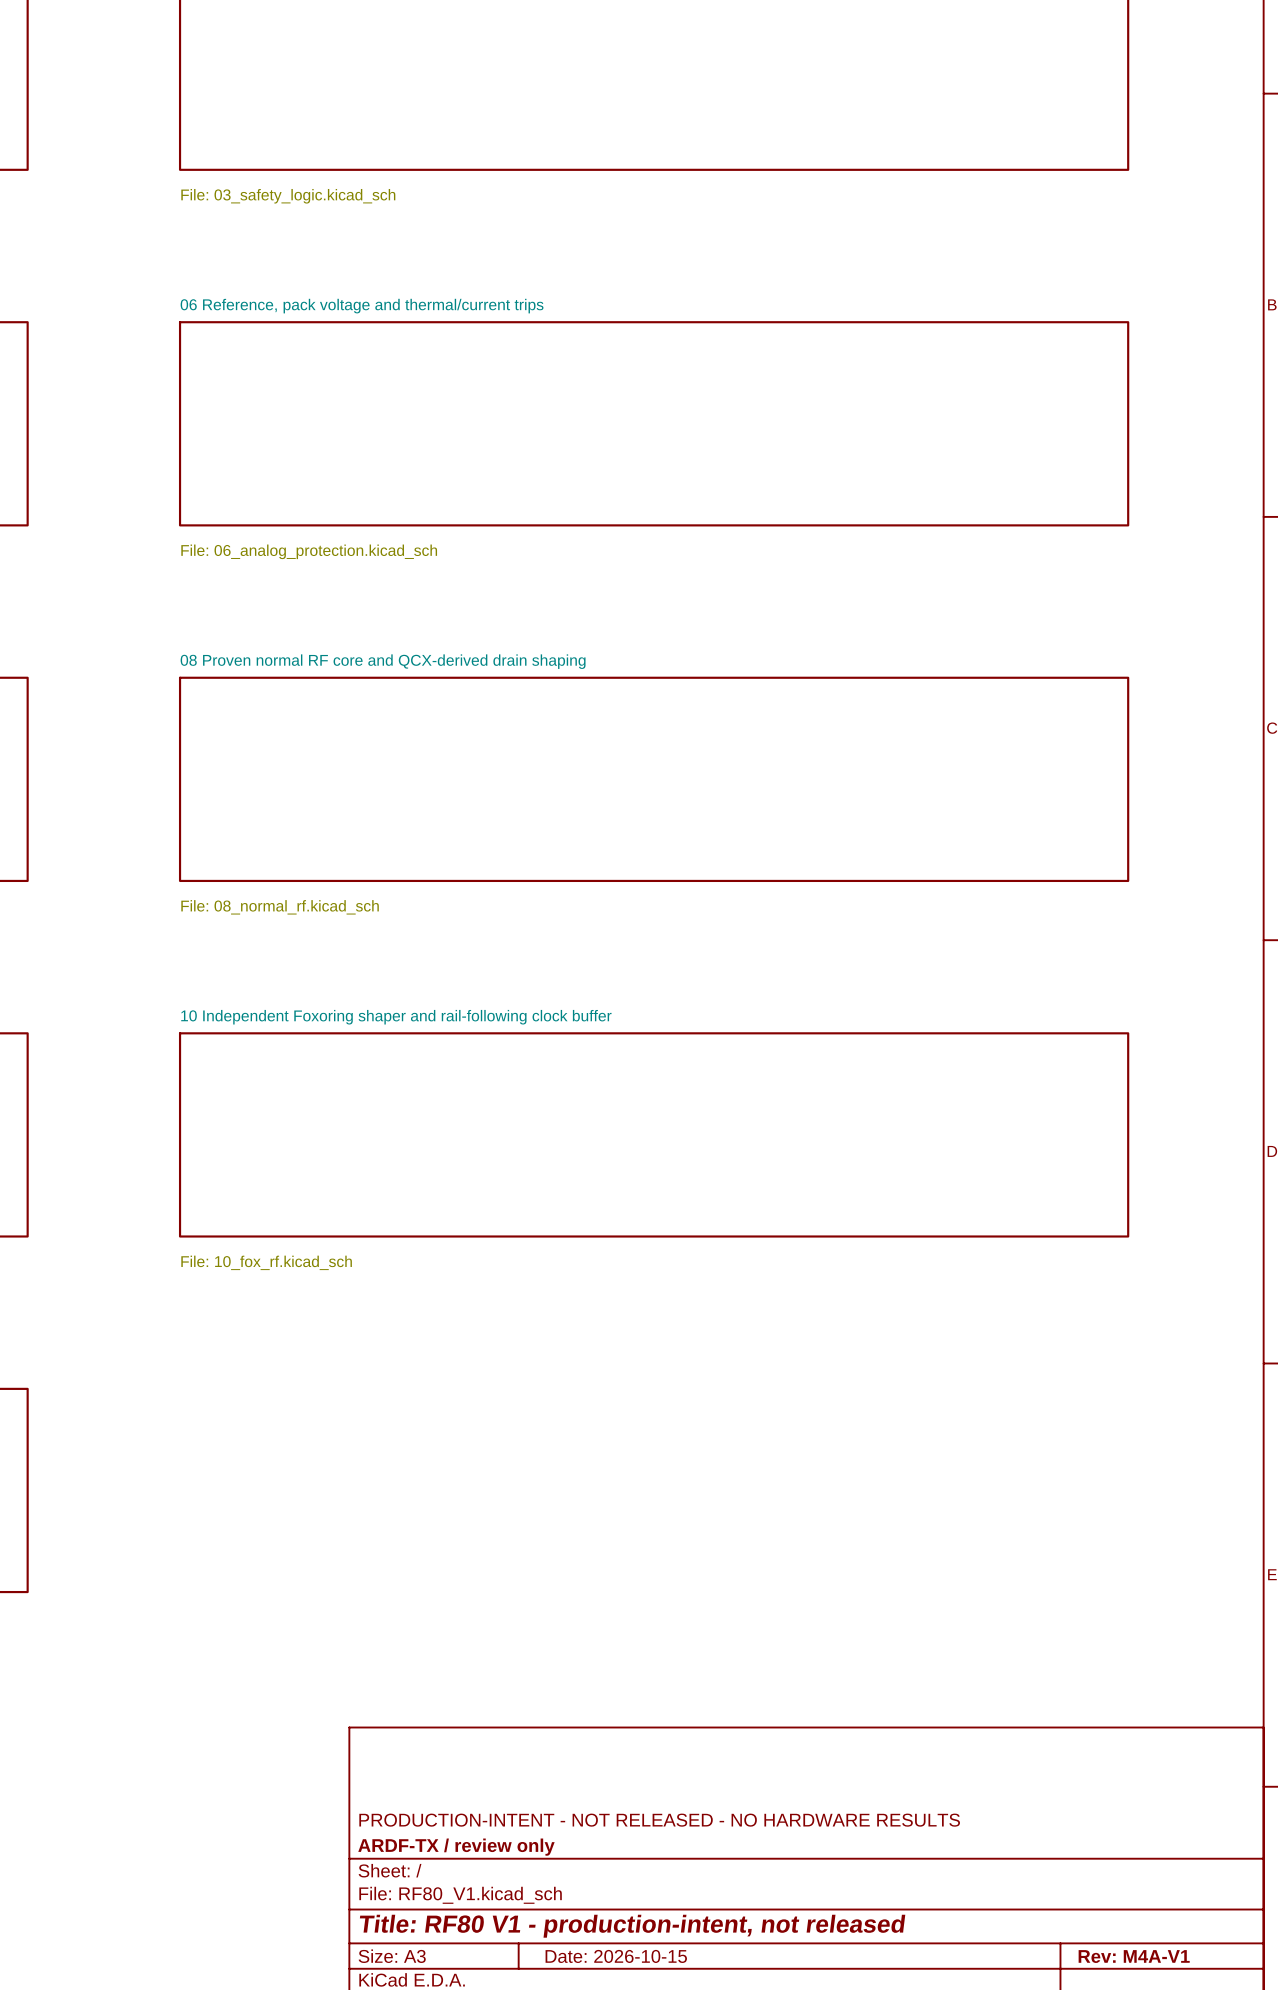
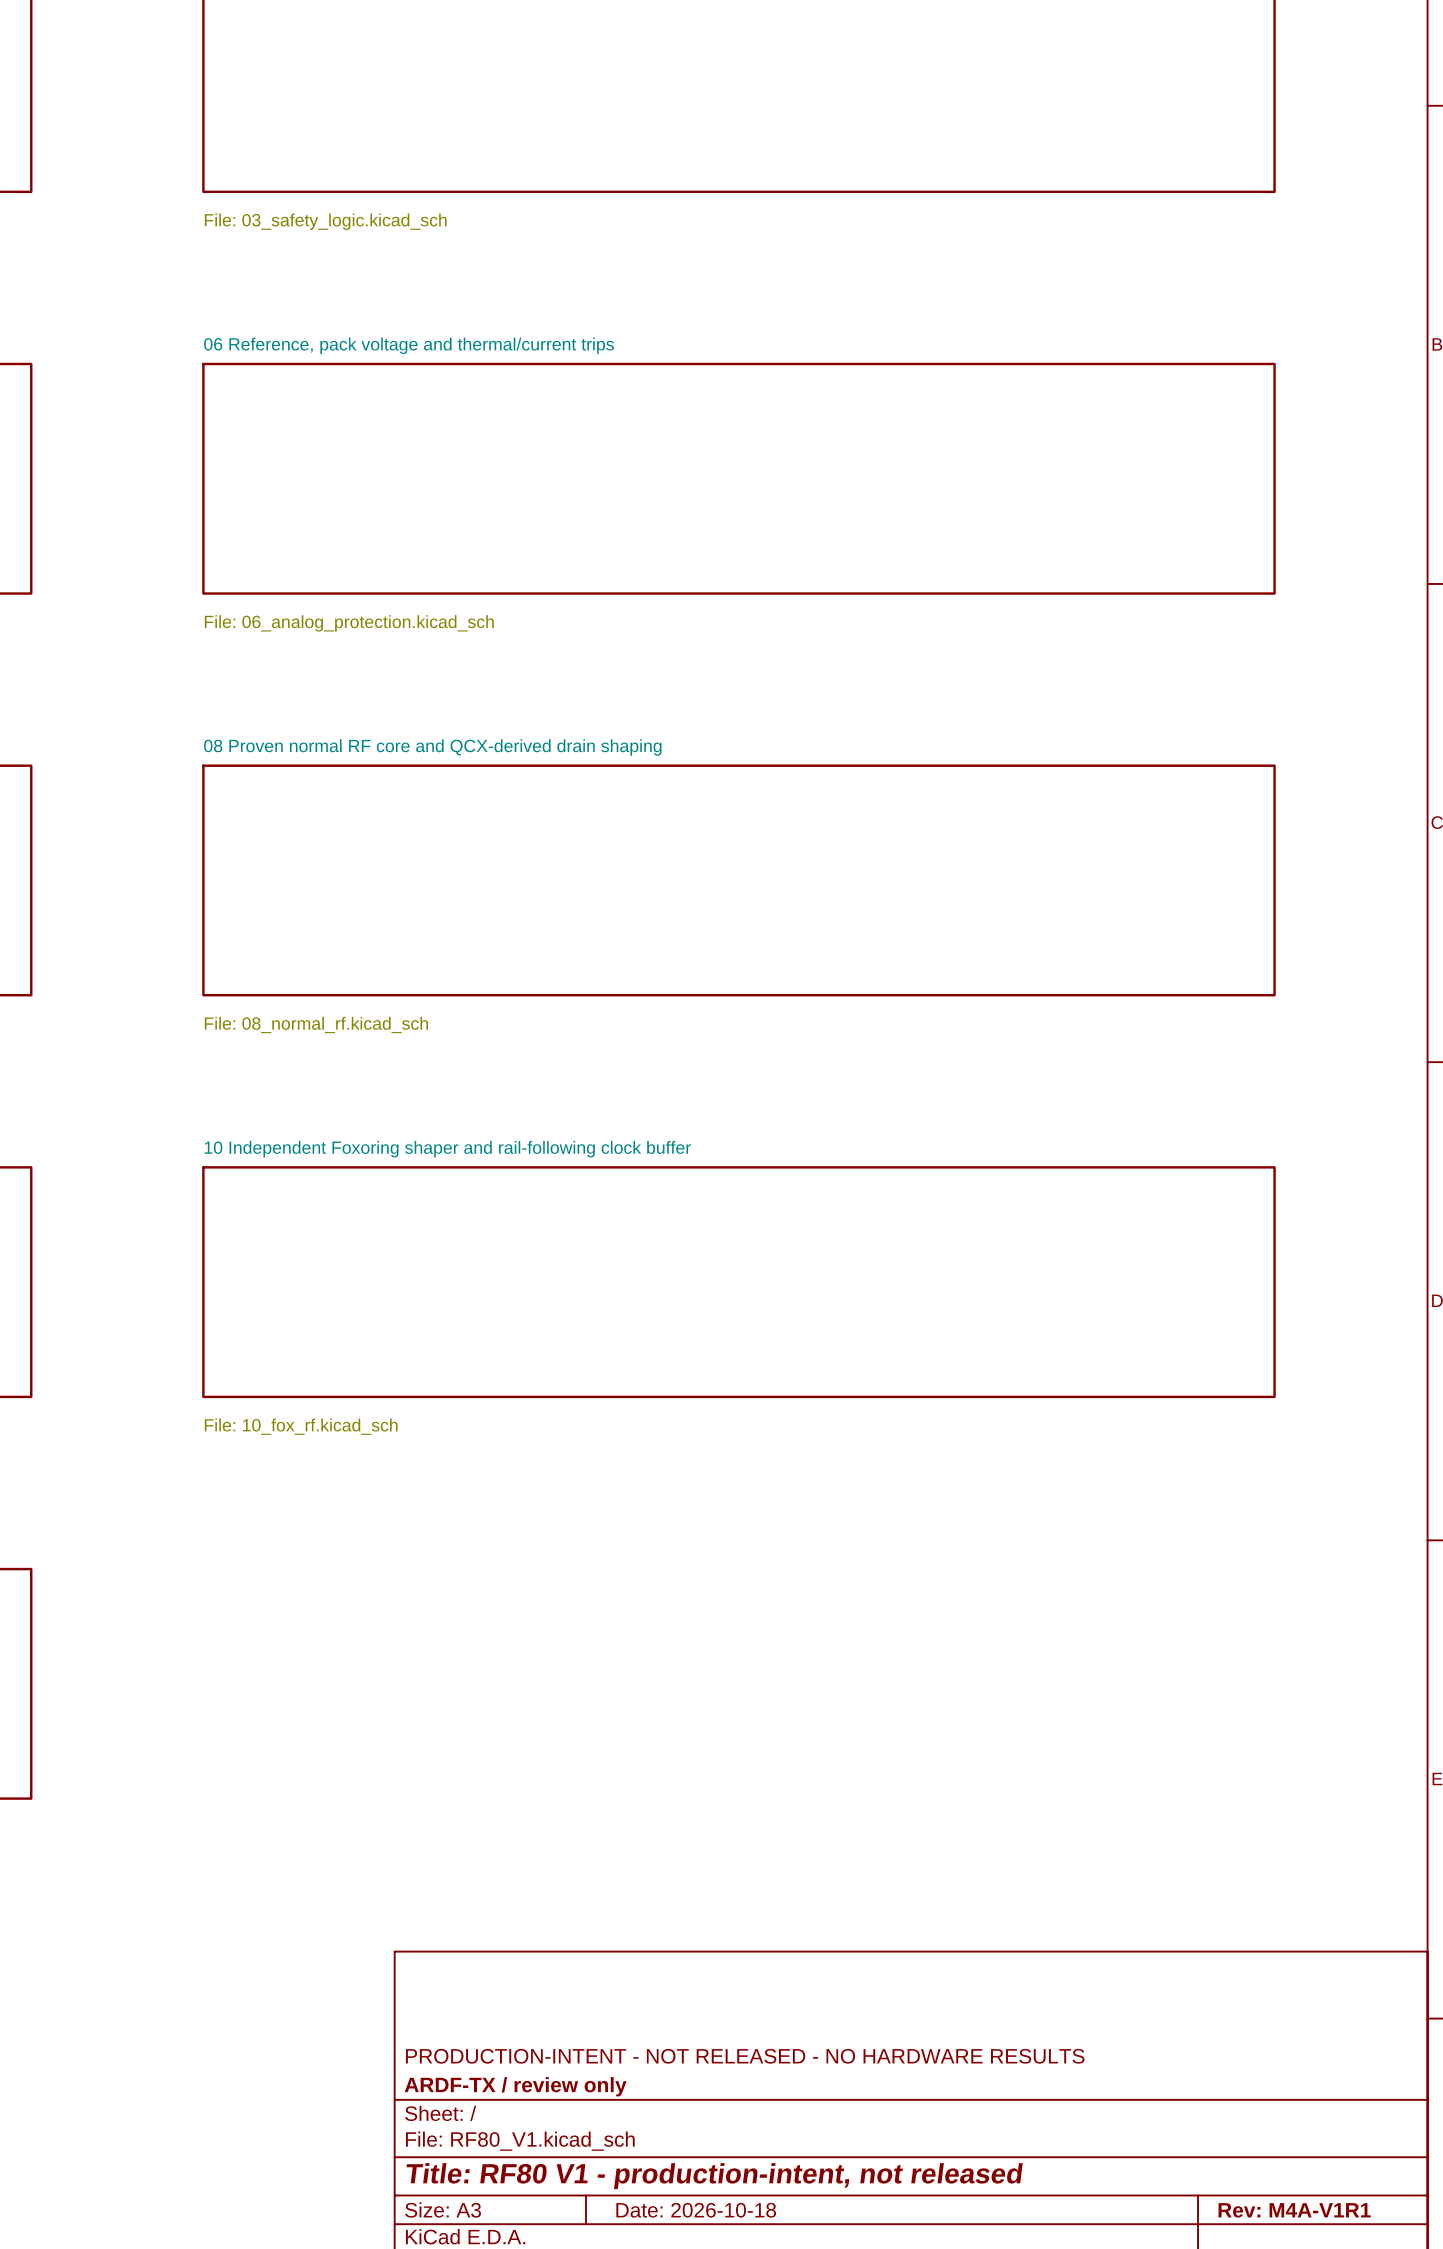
title block: Date: 2026-10-15 (616, 1956) -> Date: 2026-10-18 (696, 2210)
title block: Rev: M4A-V1 (1134, 1956) -> Rev: M4A-V1R1 (1294, 2210)

